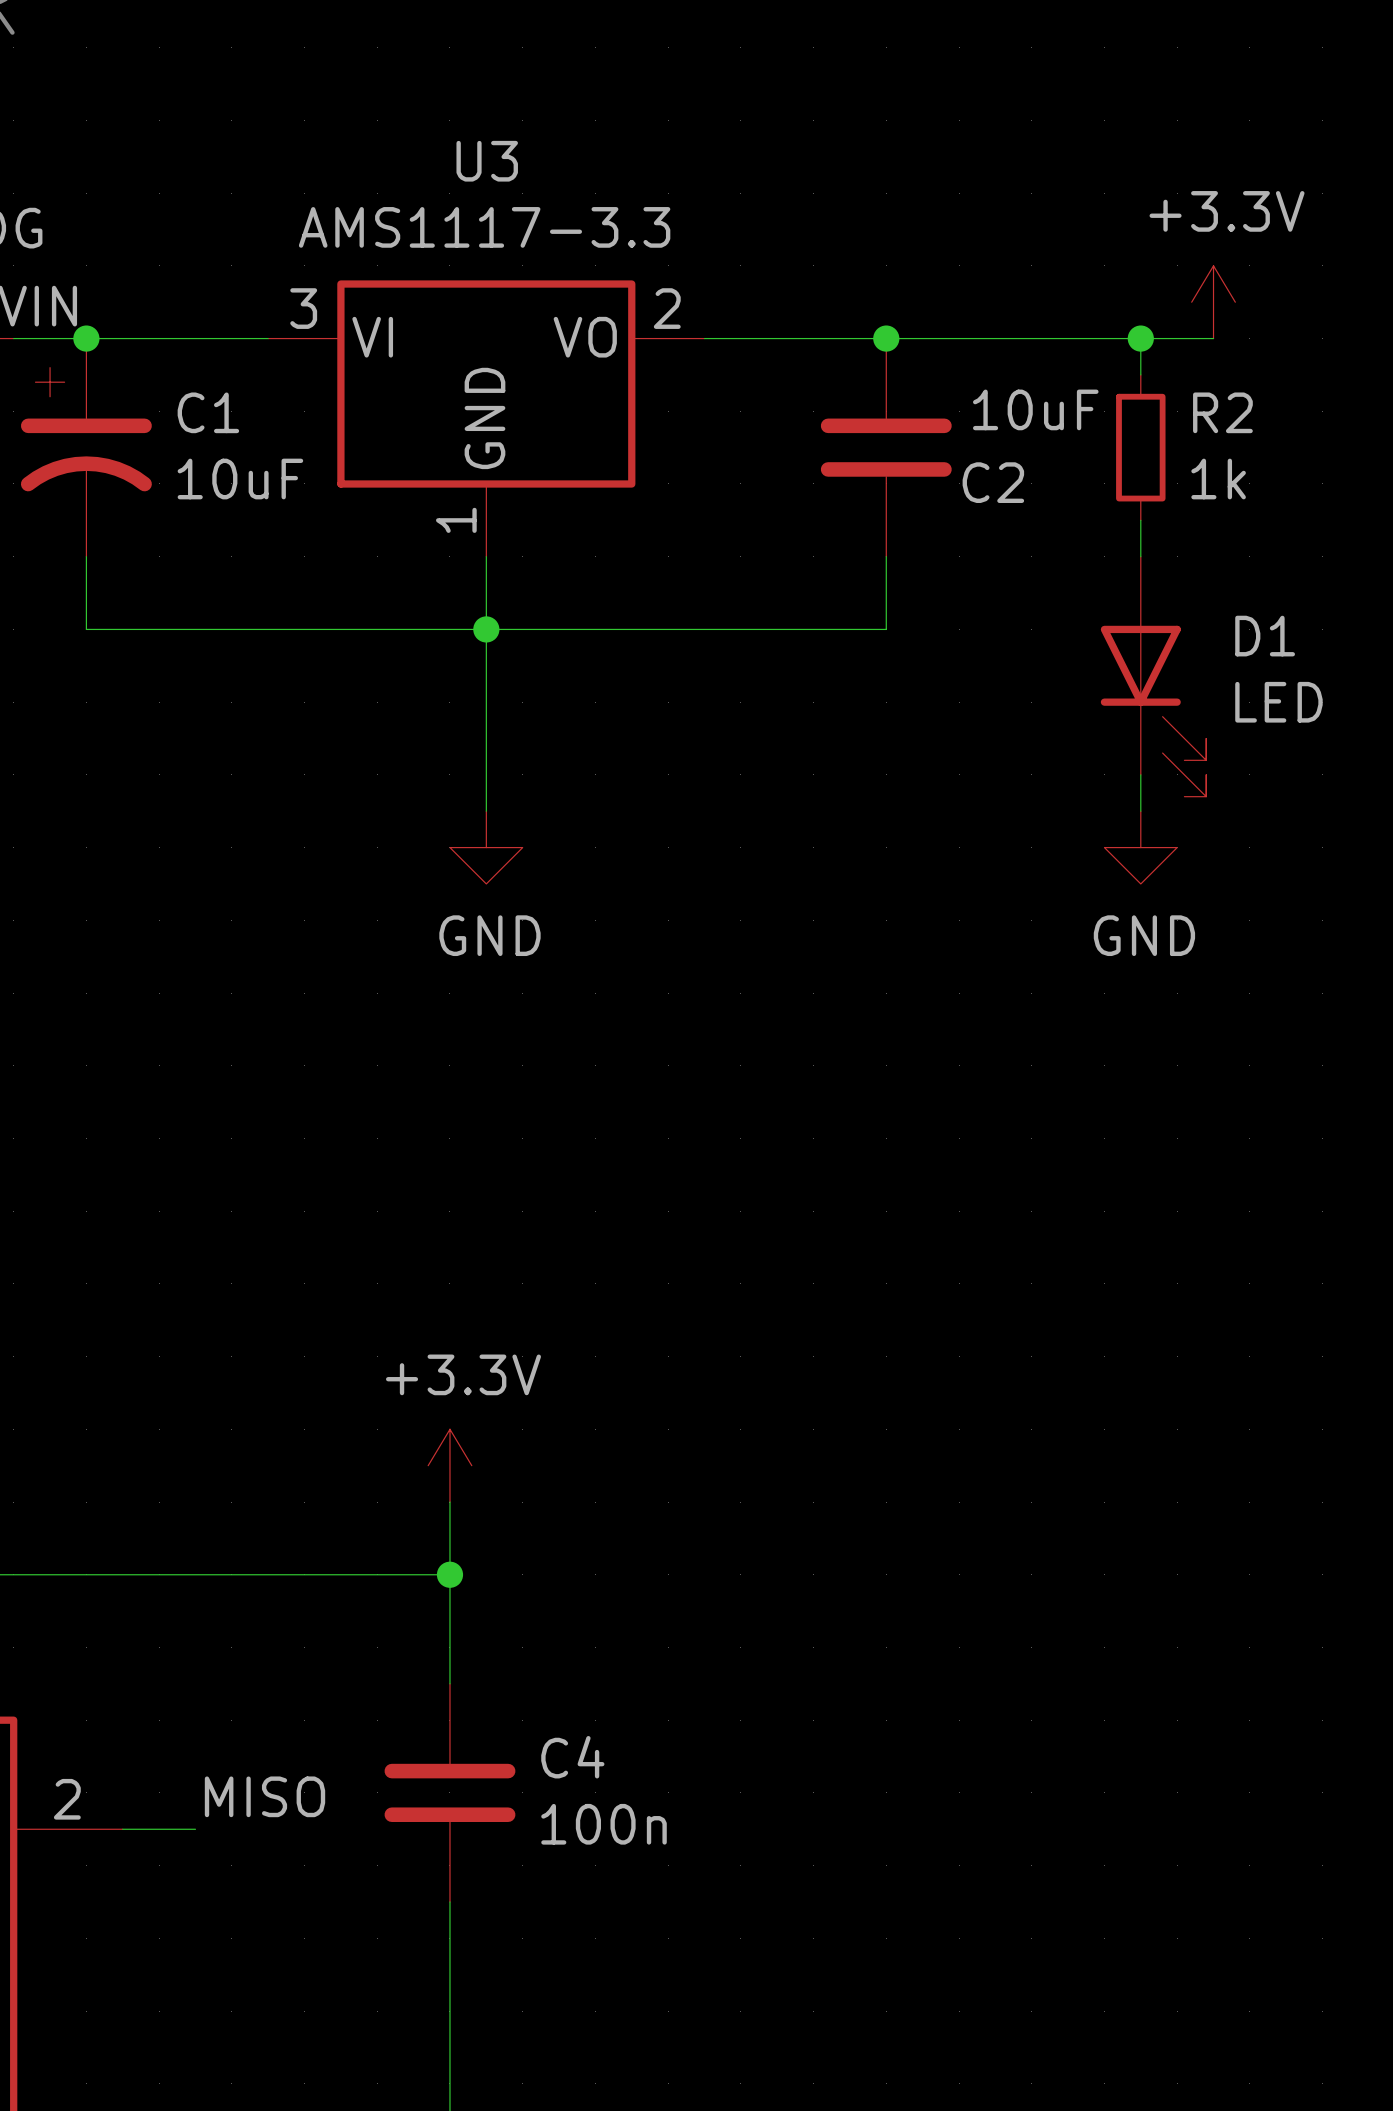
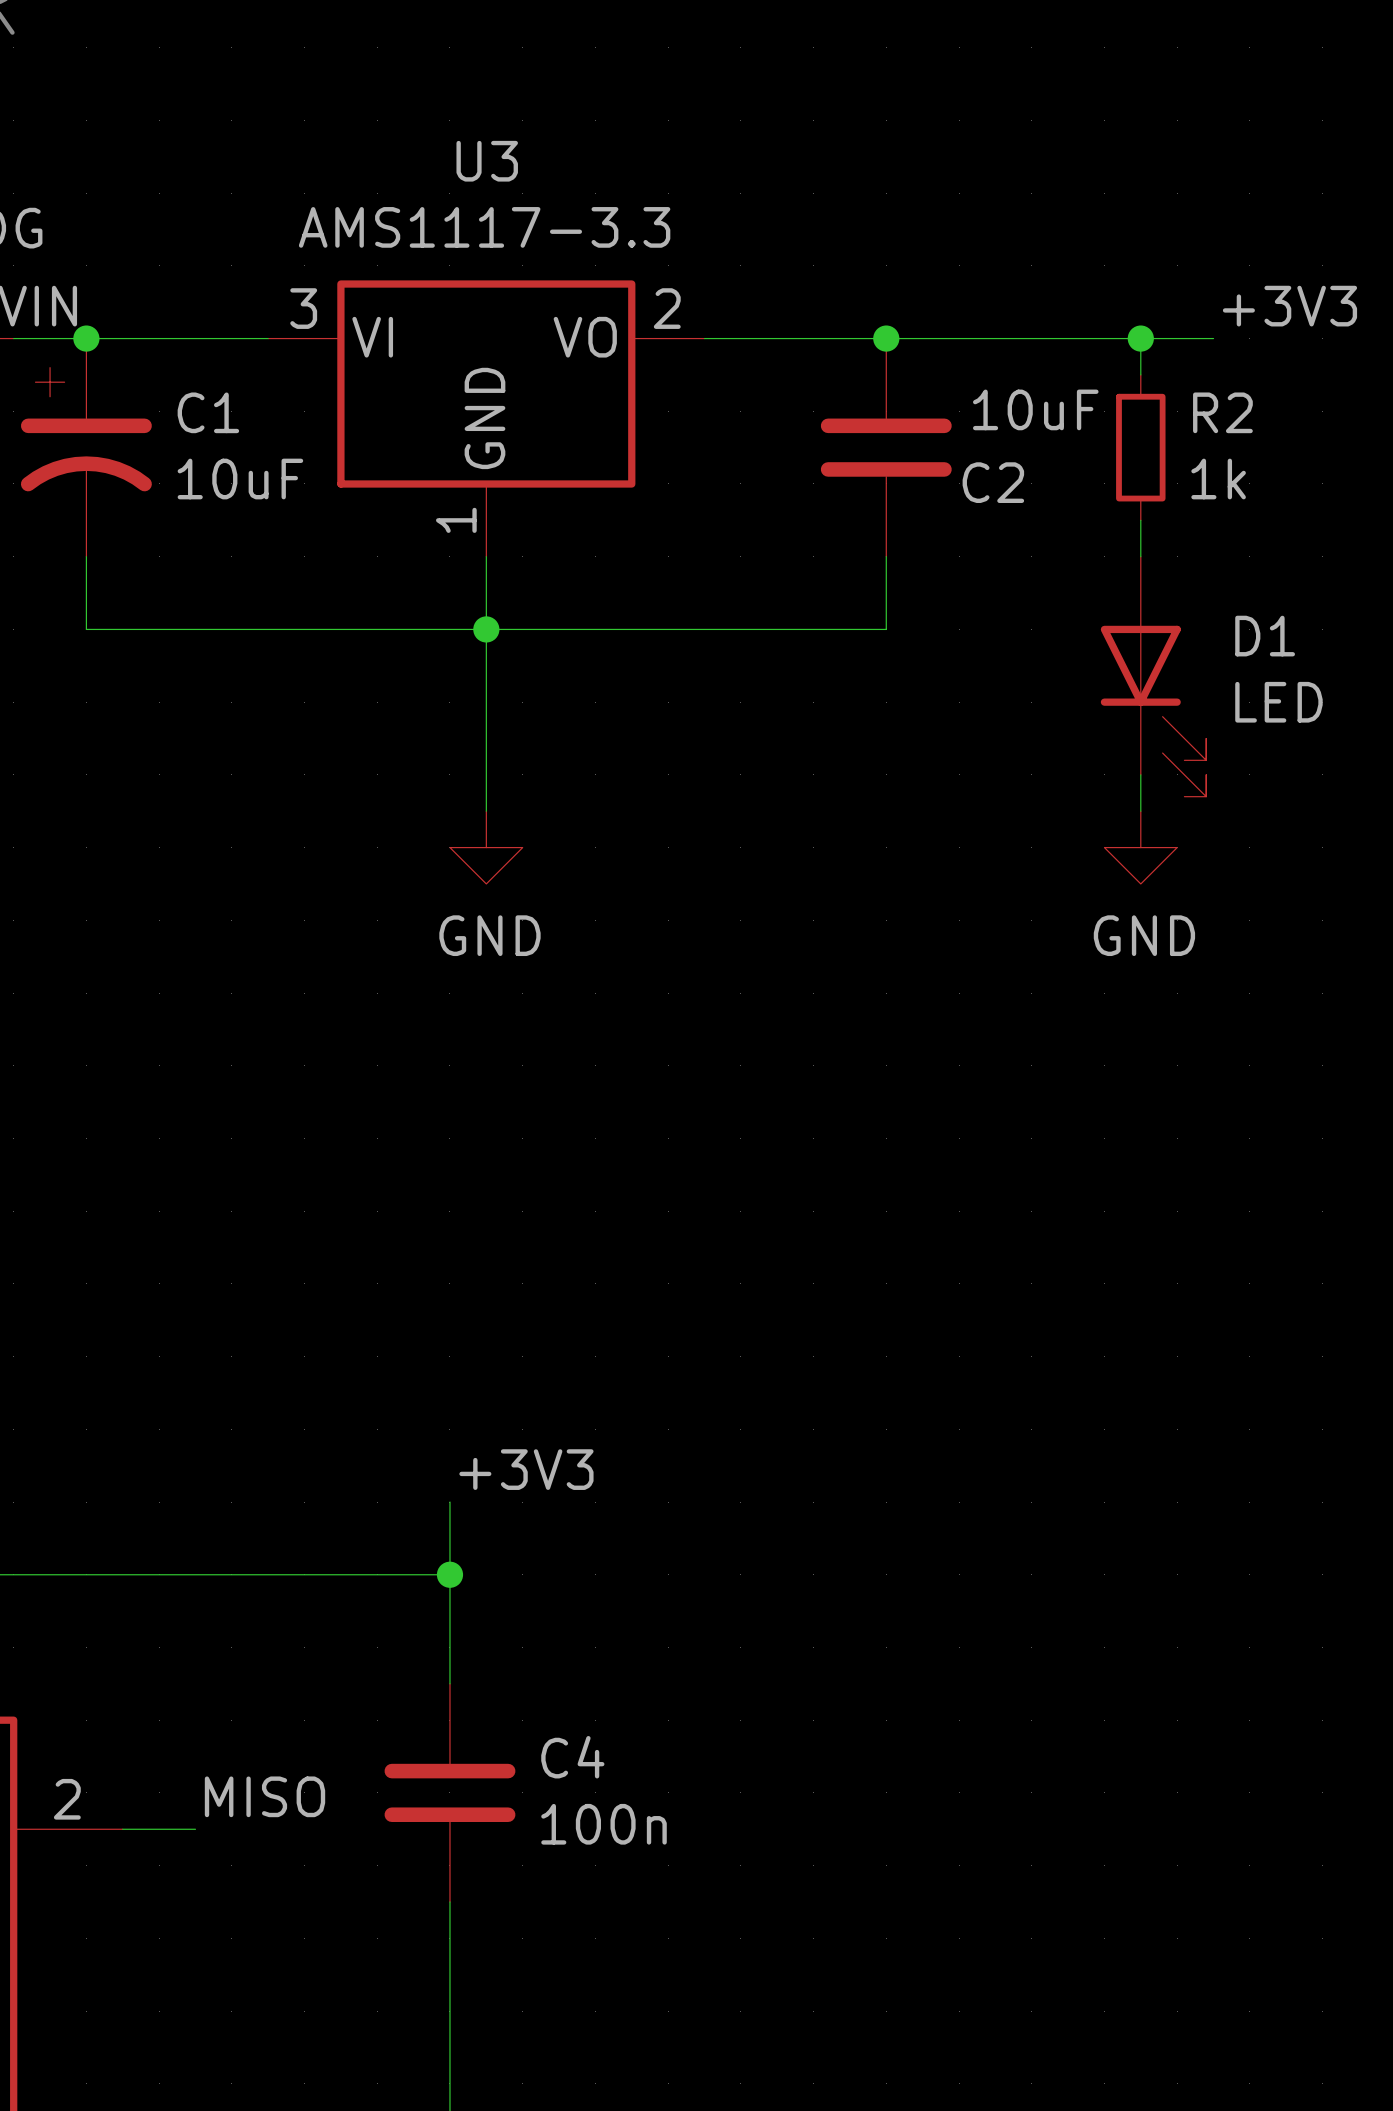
power symbol: +3.3V (1213, 302) -> none
label: none -> +3V3 (1289, 306)
power symbol: +3.3V (449, 1465) -> none
label: none -> +3V3 (526, 1469)

